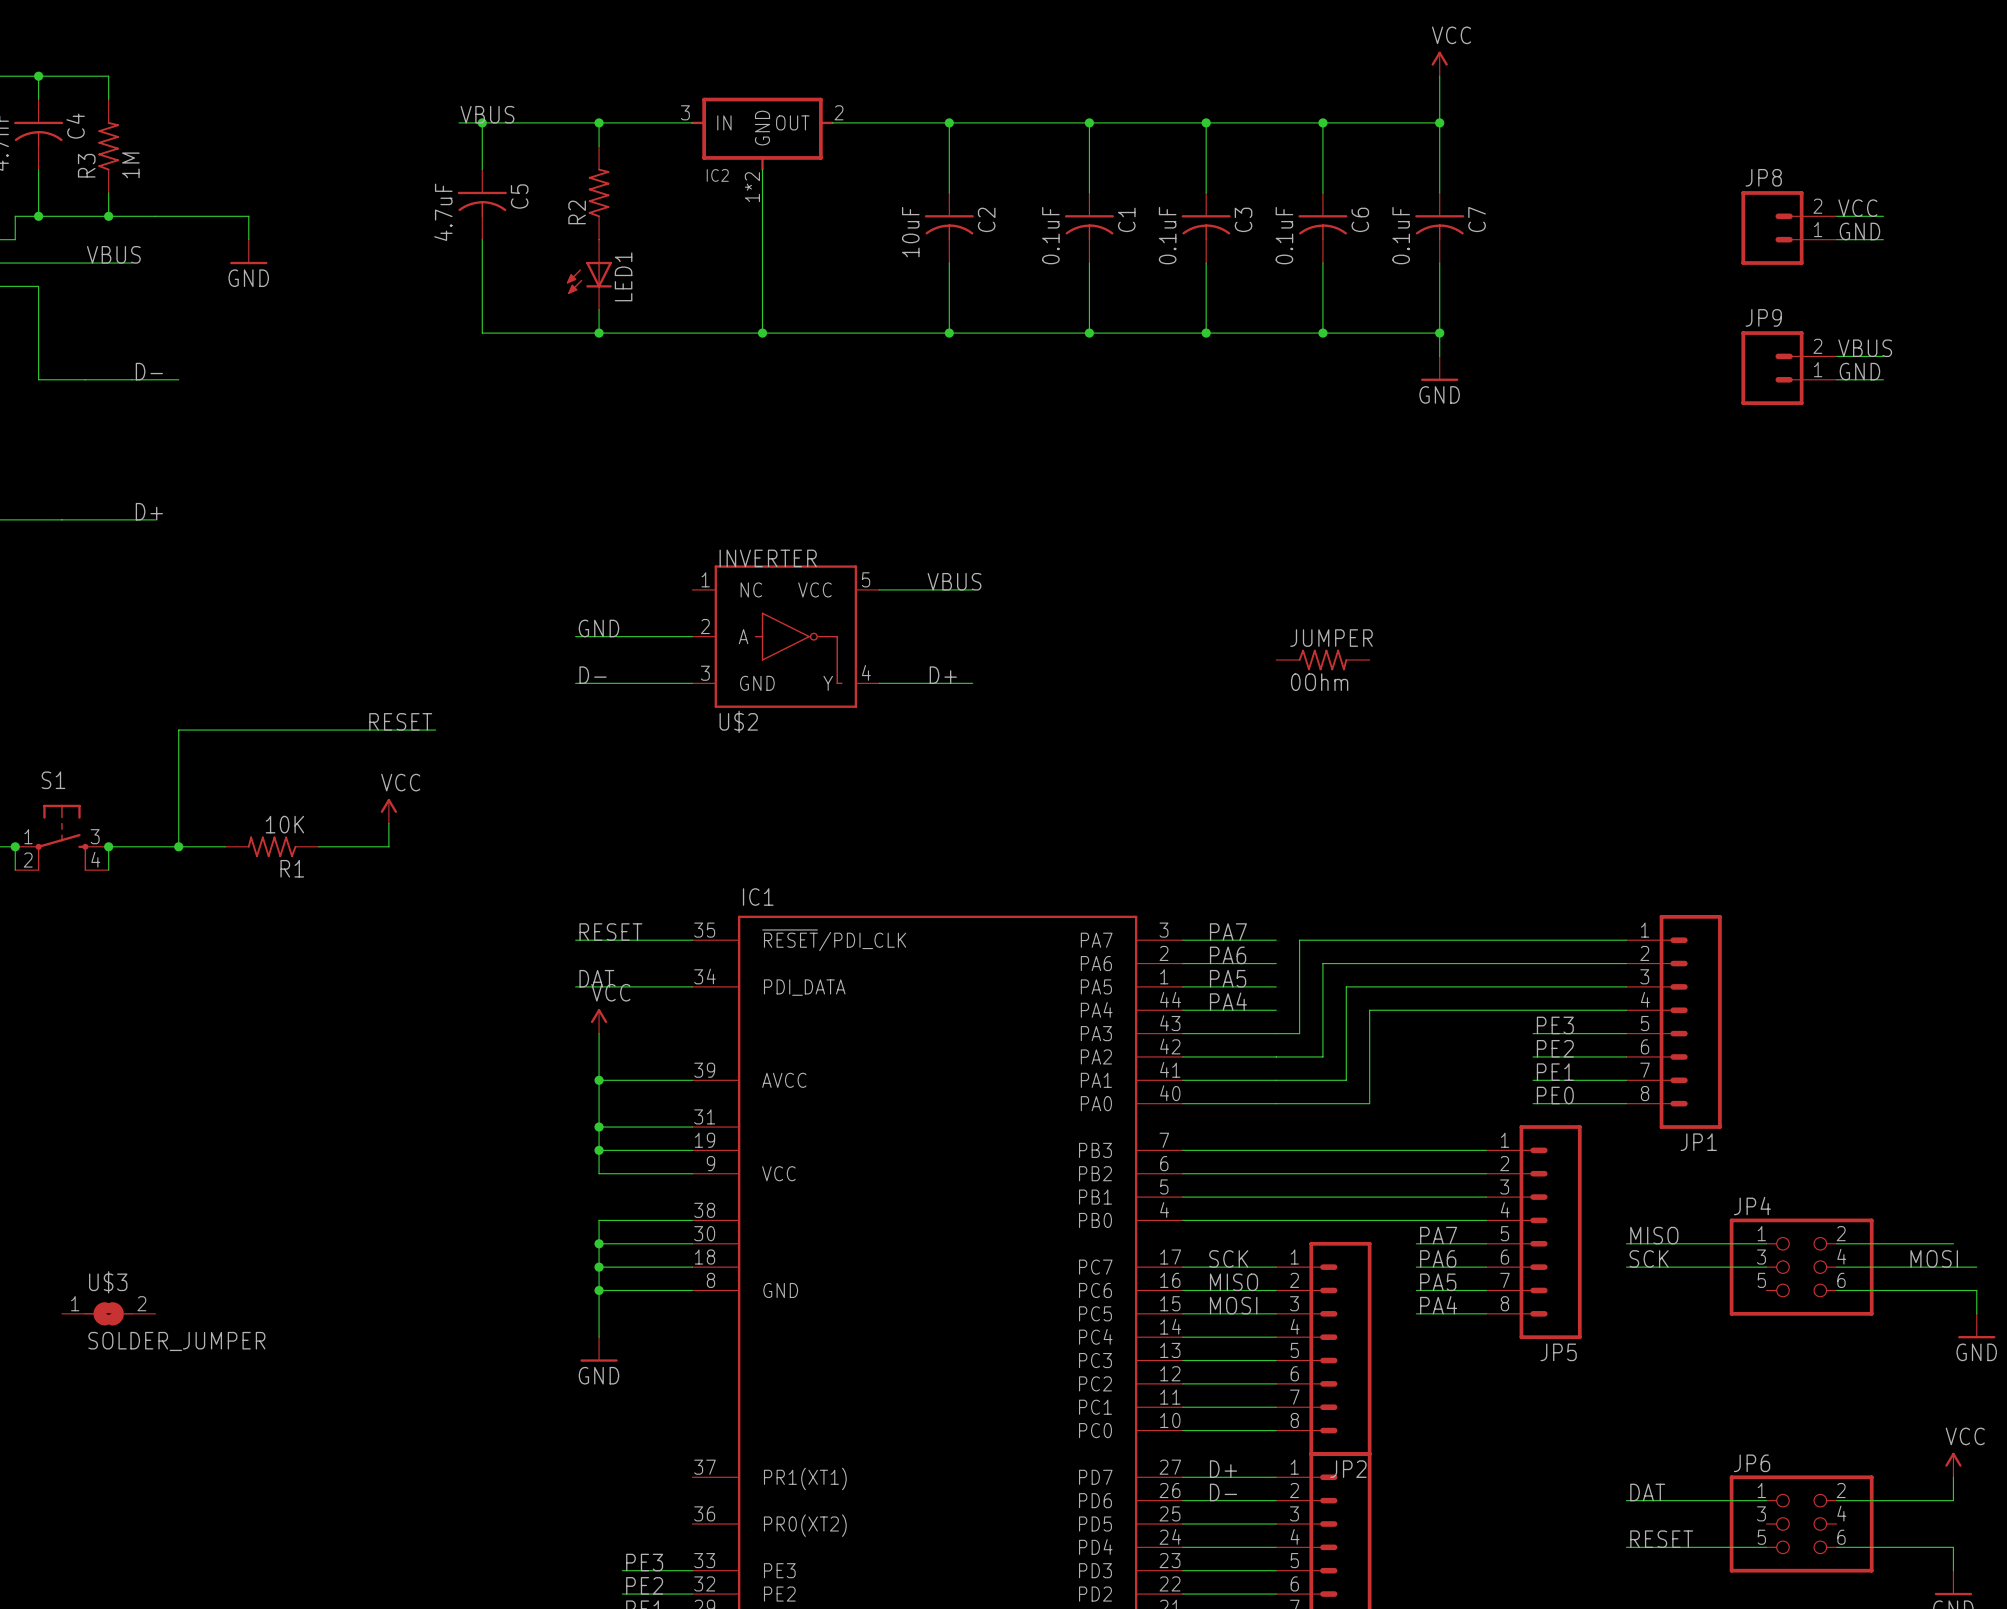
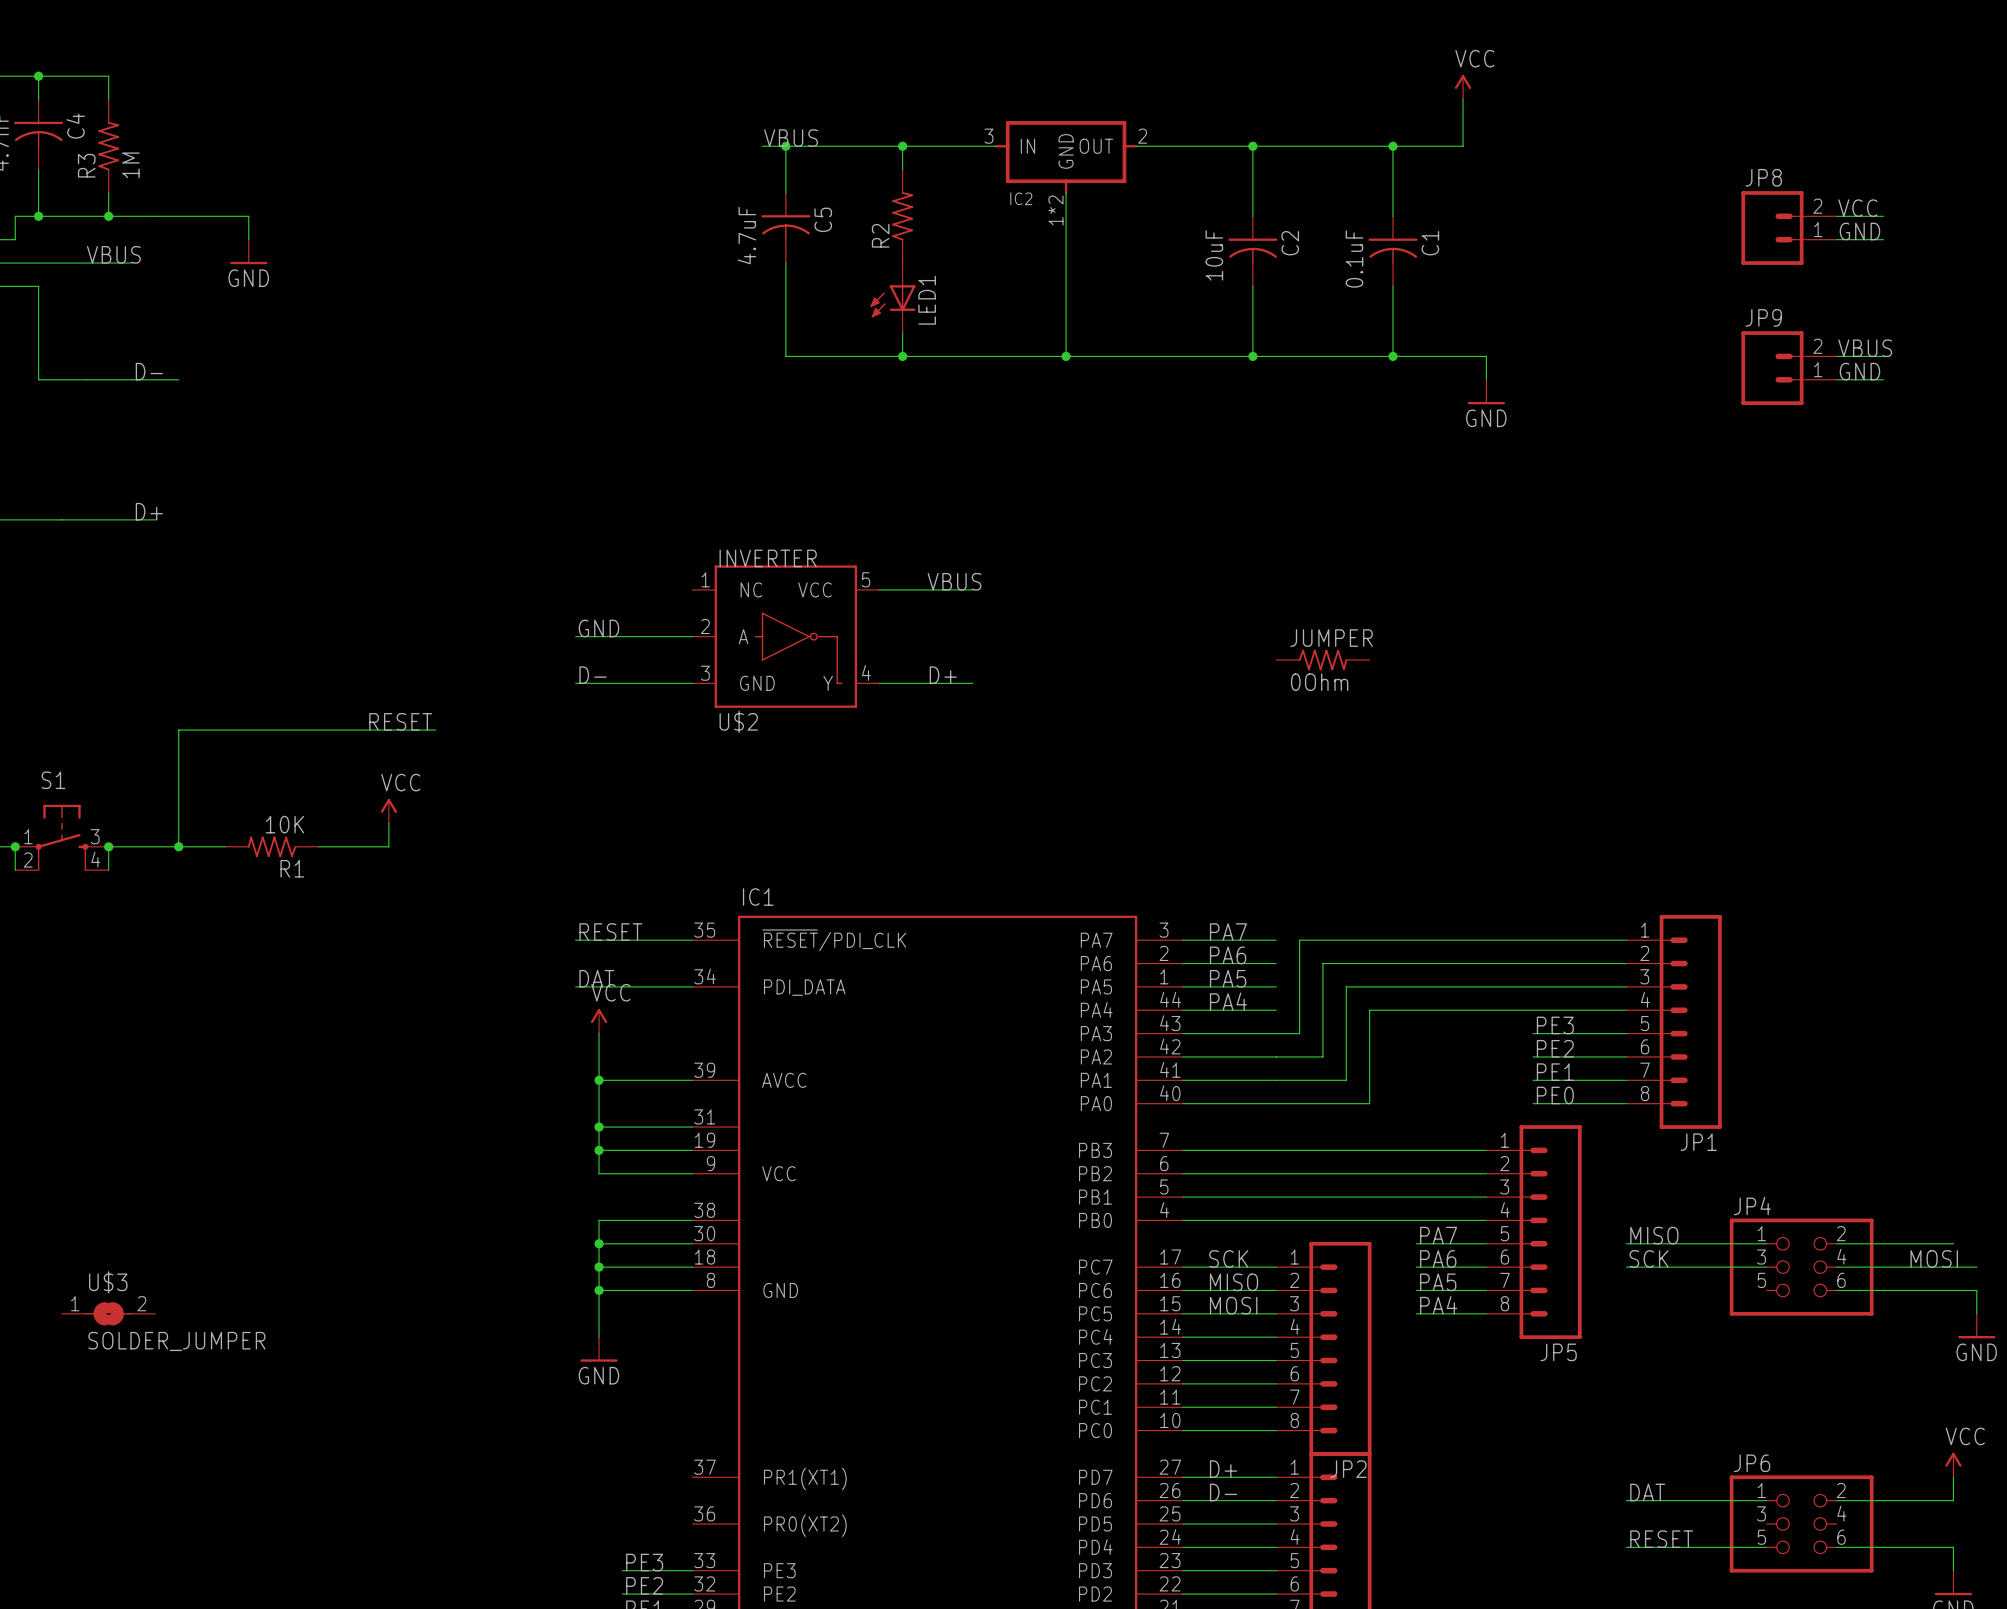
power symbol position: VCC (1439, 63) -> VCC (1463, 87)
wire: (1439, 76) (1439, 192) -> none
wire: none -> (1463, 99) (1463, 146) (1136, 146)
label: VBUS (487, 114) -> none
wire: (458, 122) (692, 122) -> none
wire: (482, 122) (482, 169) -> none
junction: (482, 122) -> none
wire: (599, 122) (599, 146) -> none
junction: (599, 122) -> none
wire: (832, 122) (1439, 122) -> none
wire: (949, 122) (949, 192) -> none
junction position: (949, 122) -> (902, 146)
wire: (1089, 122) (1089, 192) -> none
junction: (1089, 122) -> none
wire: (1206, 122) (1206, 192) -> (1252, 146) (1252, 216)
junction: (1206, 122) -> none
wire: (1322, 122) (1322, 192) -> (1393, 146) (1393, 216)
junction: (1322, 122) -> none
junction: (1439, 122) -> none
IC2 position: (762, 134) -> (1066, 157)
label: none -> VBUS (791, 138)
wire: none -> (762, 146) (996, 146)
wire: none -> (785, 146) (785, 192)
junction: none -> (785, 146)
wire: none -> (902, 146) (902, 169)
junction: none -> (1252, 146)
junction: none -> (1393, 146)
wire: (762, 169) (762, 333) -> none
R2 position: (599, 192) -> (902, 216)
wire: none -> (1066, 192) (1066, 356)
C5 position: (482, 204) -> (785, 227)
C2 position: (949, 227) -> (1252, 251)
C1 position: (1089, 227) -> (1393, 251)
C3: 0.1uF (1206, 227) -> none
C6: 0.1uF (1322, 227) -> none
C7: 0.1uF (1439, 227) -> none
wire: (482, 239) (482, 333) (1439, 333) -> none
wire: none -> (785, 263) (785, 356) (1486, 356) (1486, 379)
wire: (949, 263) (949, 333) -> none
wire: (1089, 263) (1089, 333) -> none
wire: (1206, 263) (1206, 333) -> (1252, 286) (1252, 356)
wire: (1322, 263) (1322, 333) -> (1393, 286) (1393, 356)
wire: (1439, 263) (1439, 356) -> none
LED1 position: (589, 274) -> (892, 298)
wire: (599, 309) (599, 333) -> none
junction: (599, 333) -> none
junction: (762, 333) -> none
wire: none -> (902, 333) (902, 356)
junction position: (949, 333) -> (902, 356)
junction position: (1089, 333) -> (1066, 356)
junction: (1206, 333) -> none
junction: (1322, 333) -> none
junction: (1439, 333) -> none
junction: none -> (1252, 356)
junction: none -> (1393, 356)
power symbol position: GND (1439, 368) -> GND (1486, 392)

